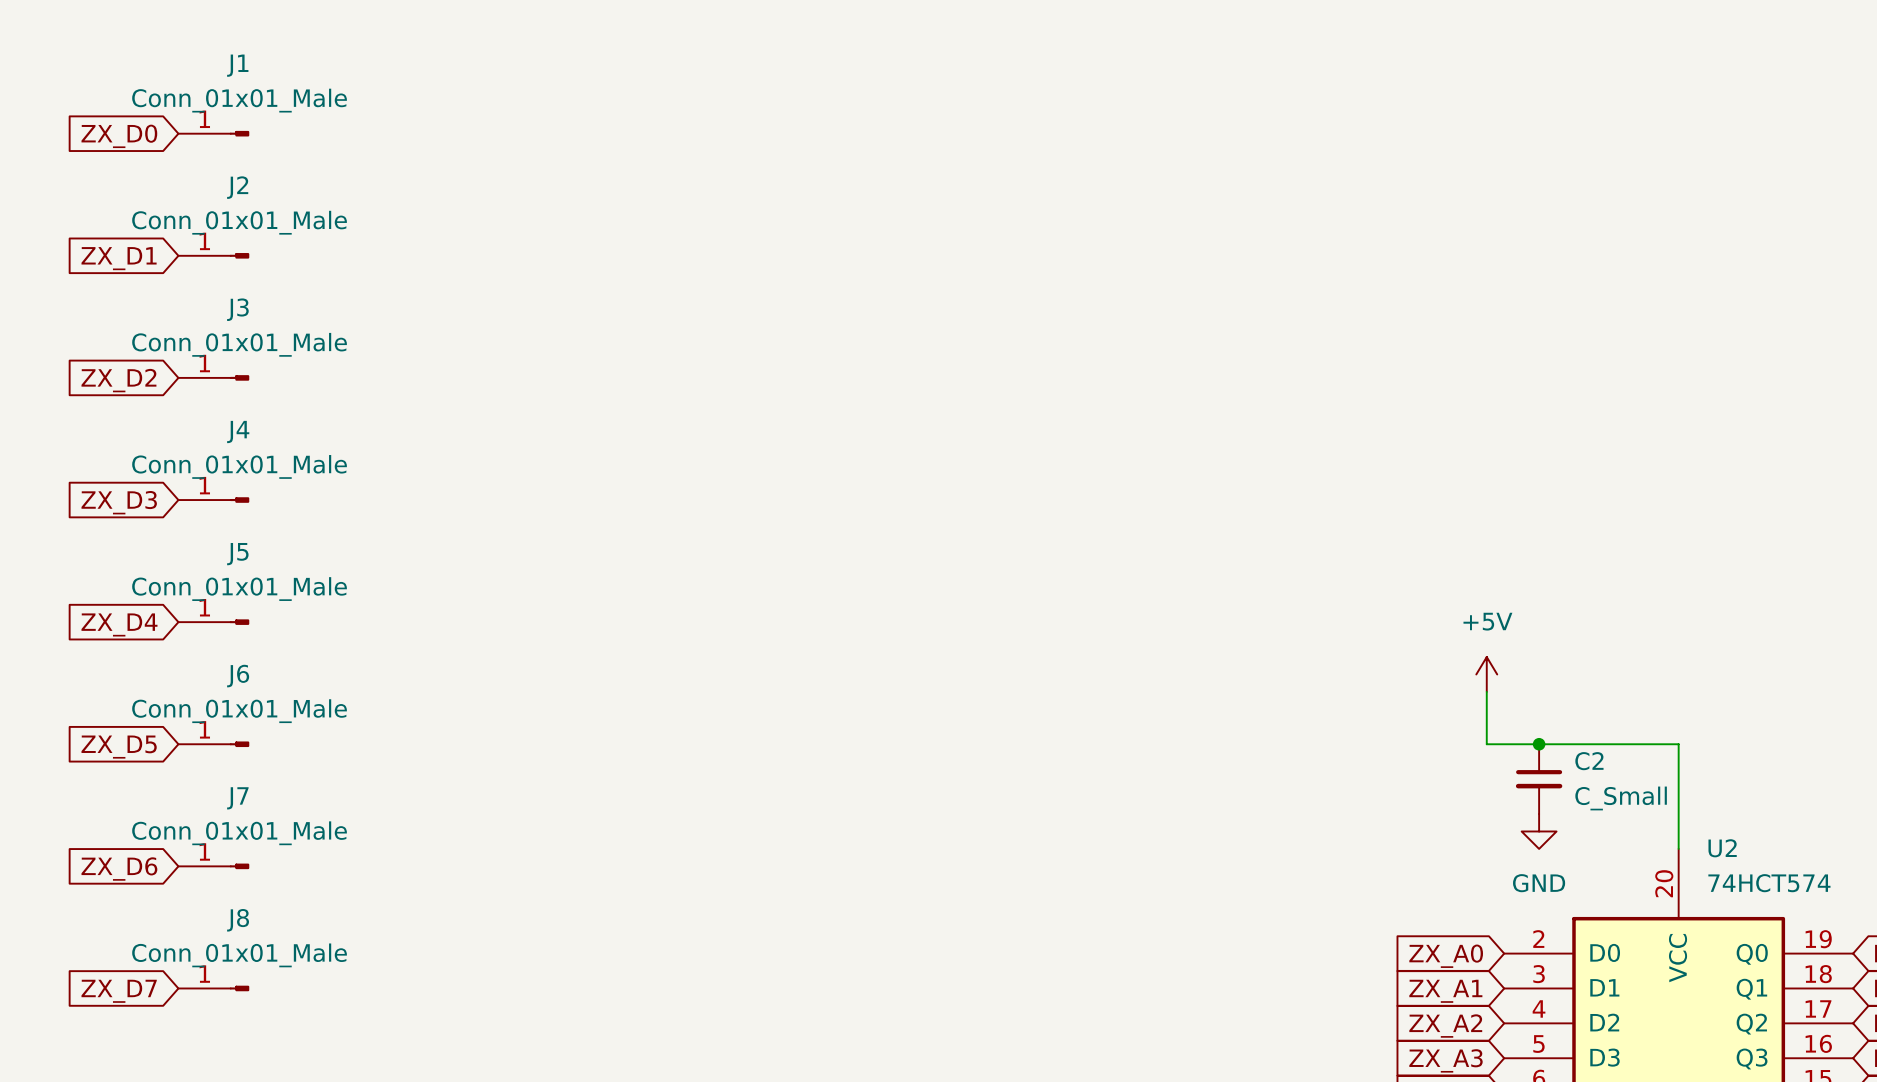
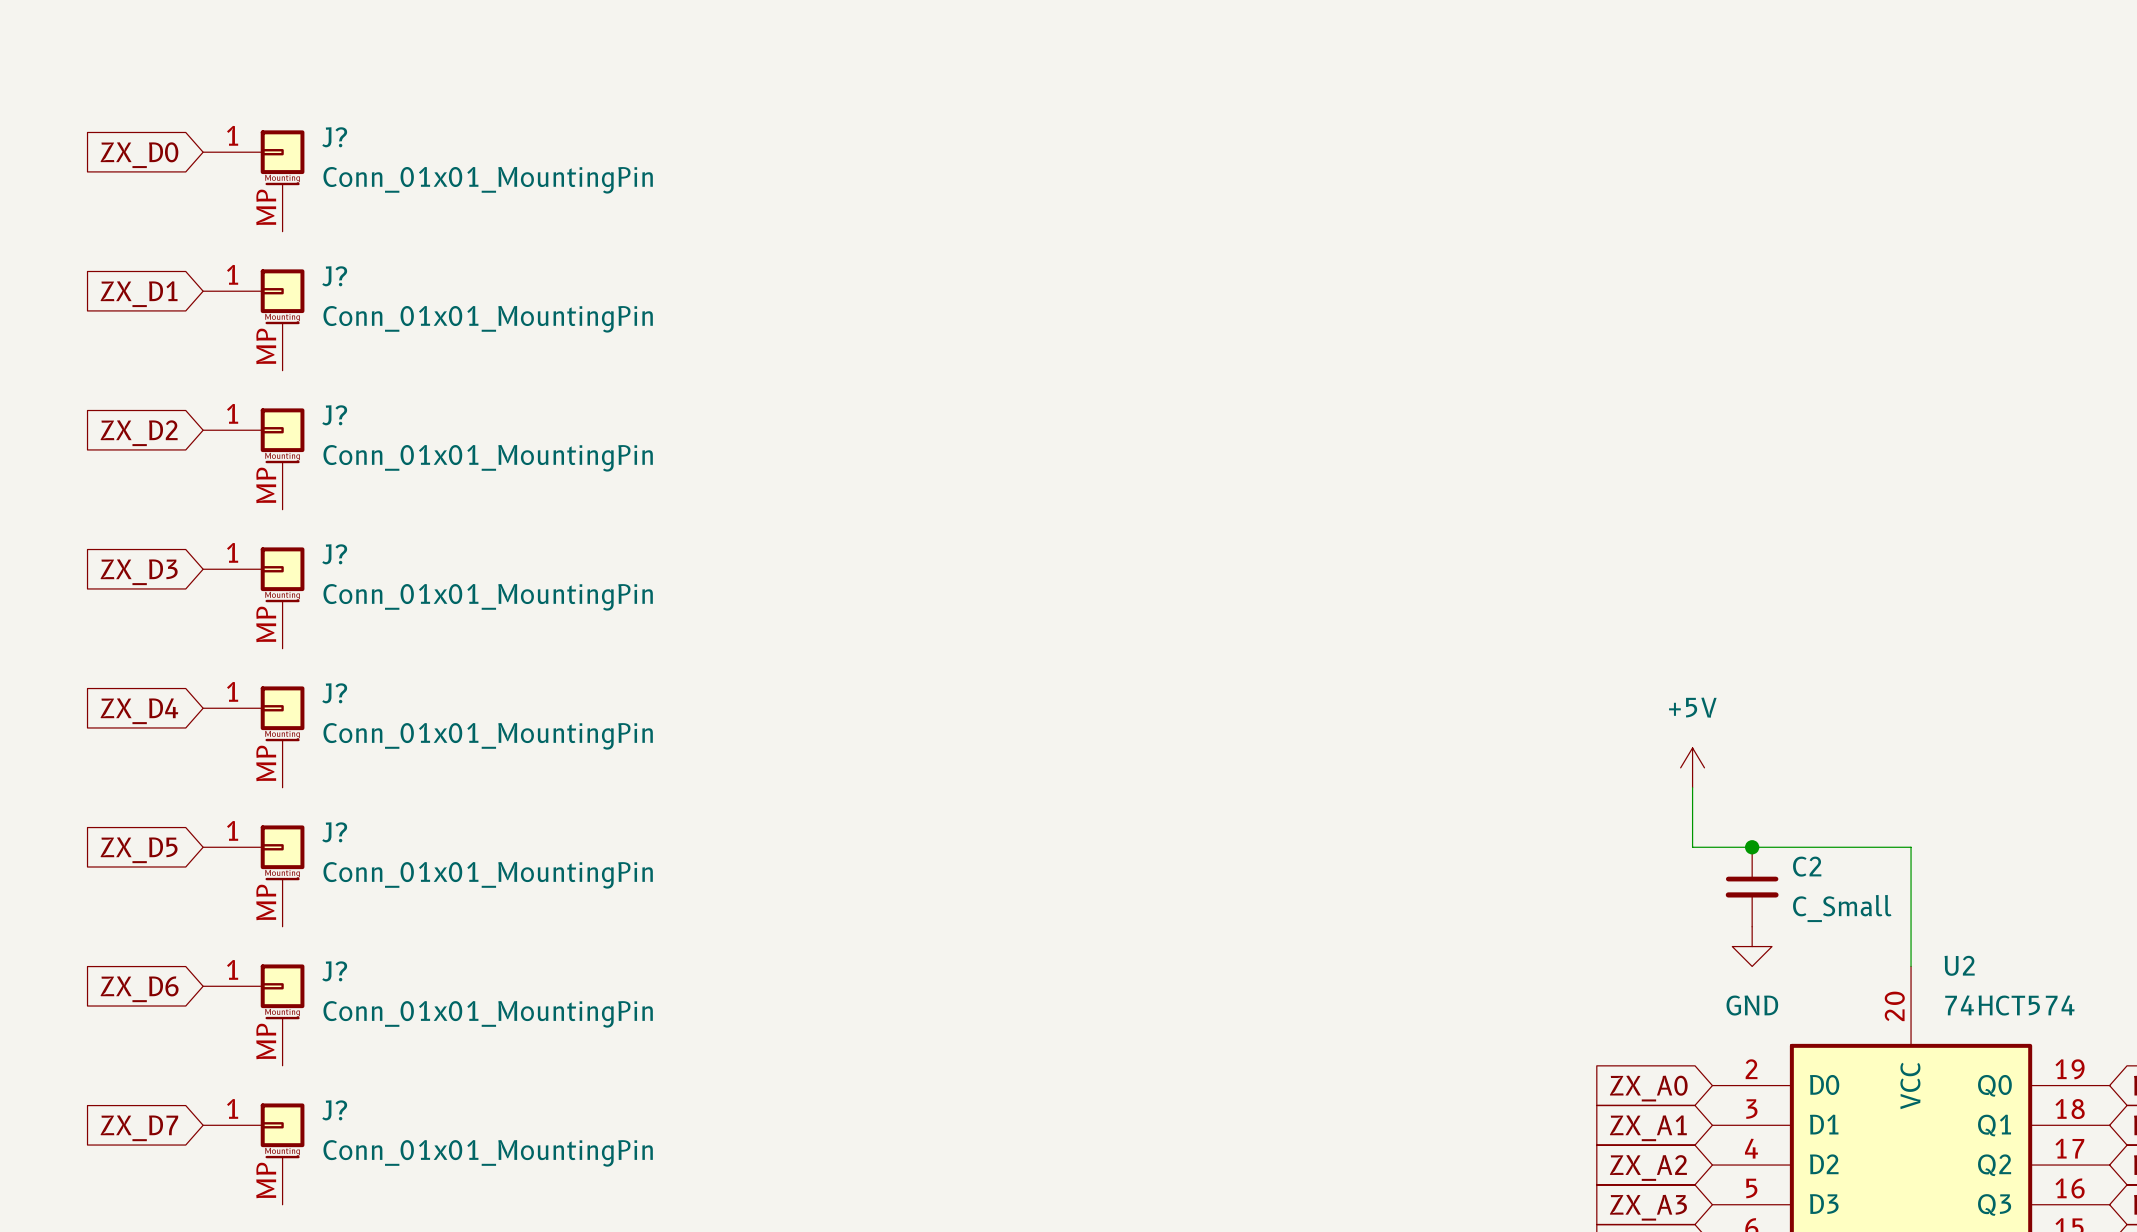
J1: Conn_01x01_Male (213, 133) -> none
J?: none -> Conn_01x01_MountingPin (253, 181)
J2: Conn_01x01_Male (213, 255) -> none
J?: none -> Conn_01x01_MountingPin (253, 320)
J3: Conn_01x01_Male (213, 377) -> none
J?: none -> Conn_01x01_MountingPin (253, 459)
J4: Conn_01x01_Male (213, 500) -> none
J?: none -> Conn_01x01_MountingPin (253, 598)
J5: Conn_01x01_Male (213, 622) -> none
J?: none -> Conn_01x01_MountingPin (253, 737)
J6: Conn_01x01_Male (213, 744) -> none
J?: none -> Conn_01x01_MountingPin (253, 876)
J7: Conn_01x01_Male (213, 866) -> none
J?: none -> Conn_01x01_MountingPin (253, 1015)
J8: Conn_01x01_Male (213, 988) -> none
J?: none -> Conn_01x01_MountingPin (253, 1154)

